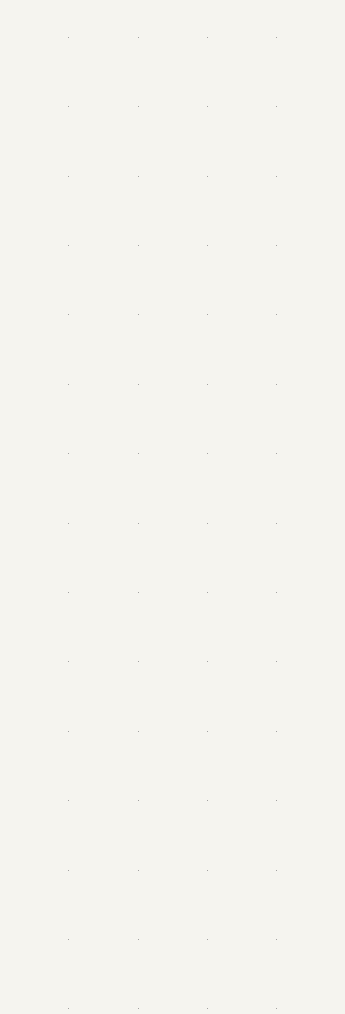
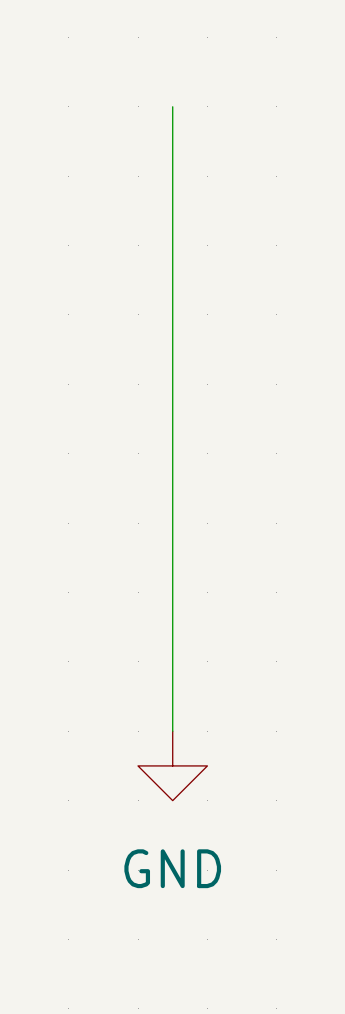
wire: none -> (172, 106) (172, 731)
power symbol: none -> GND (172, 765)

